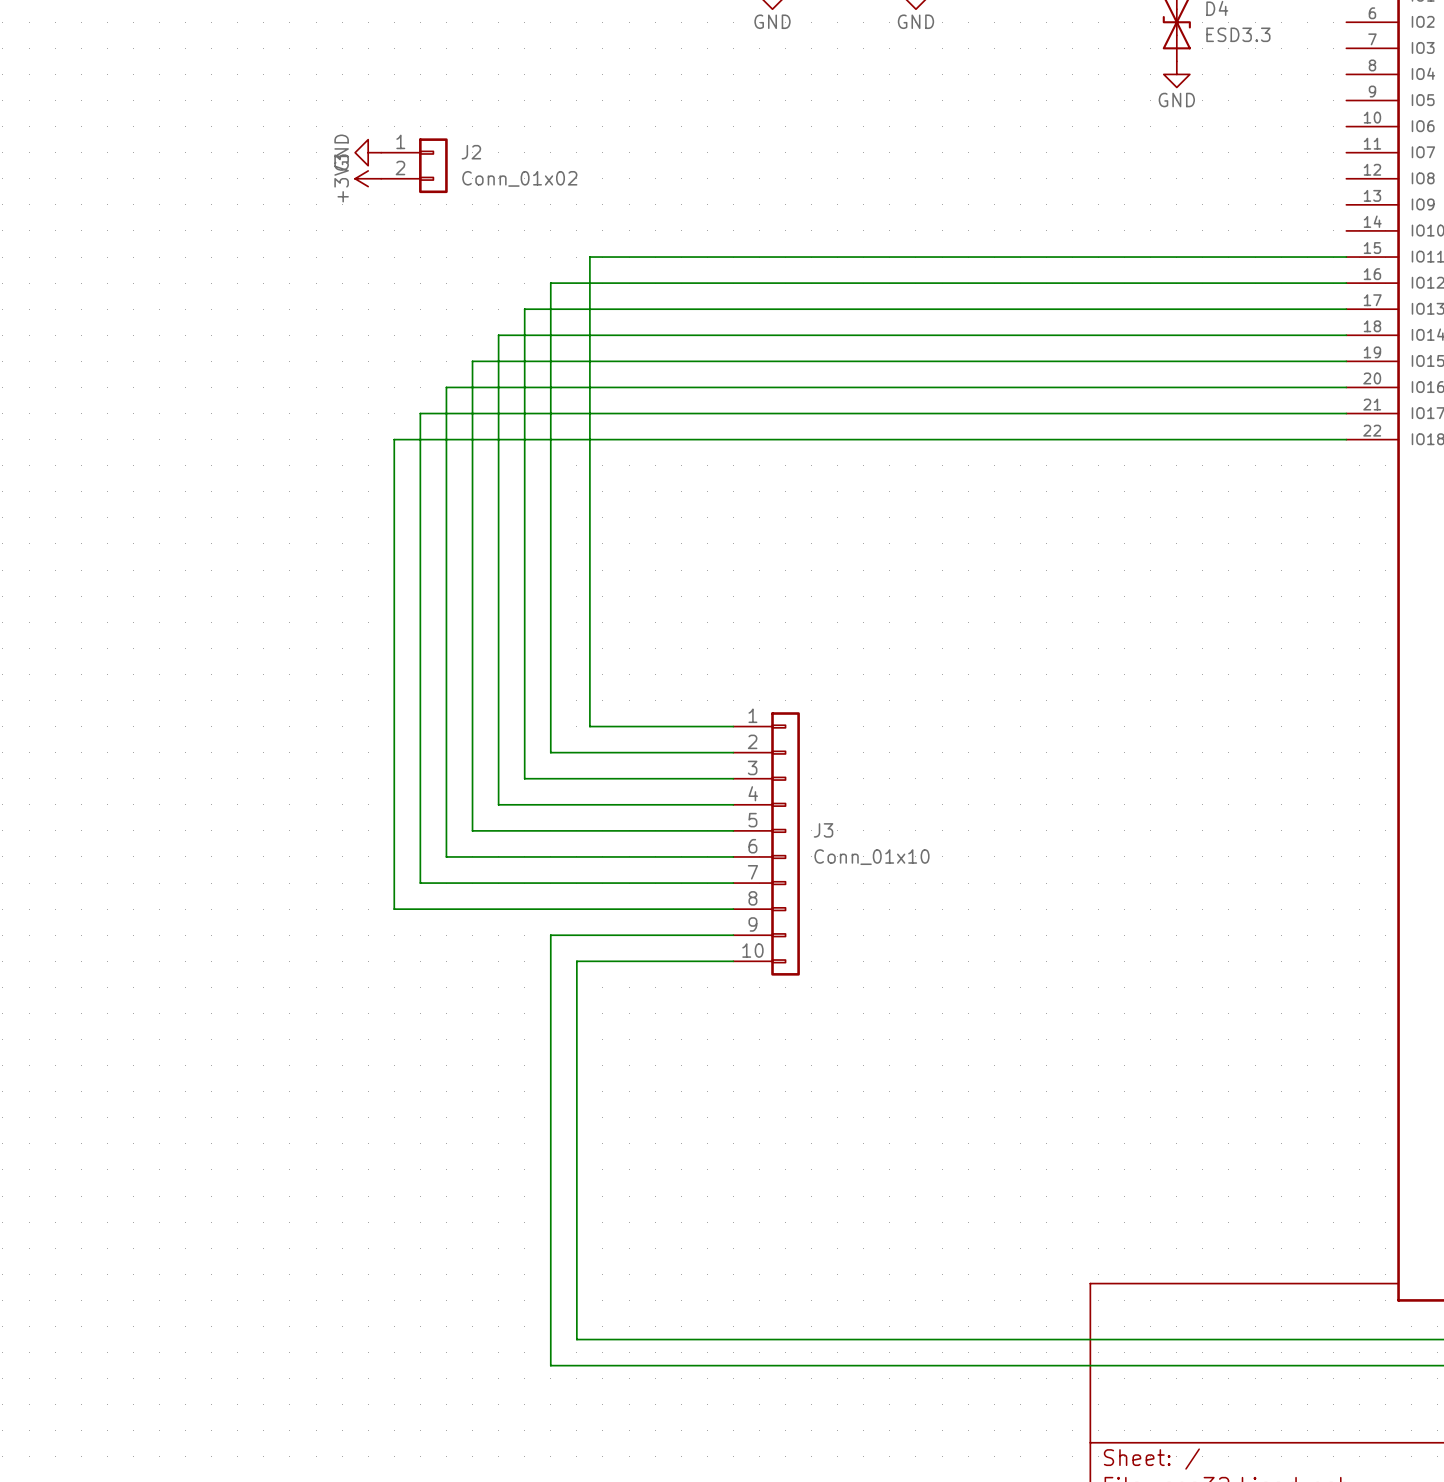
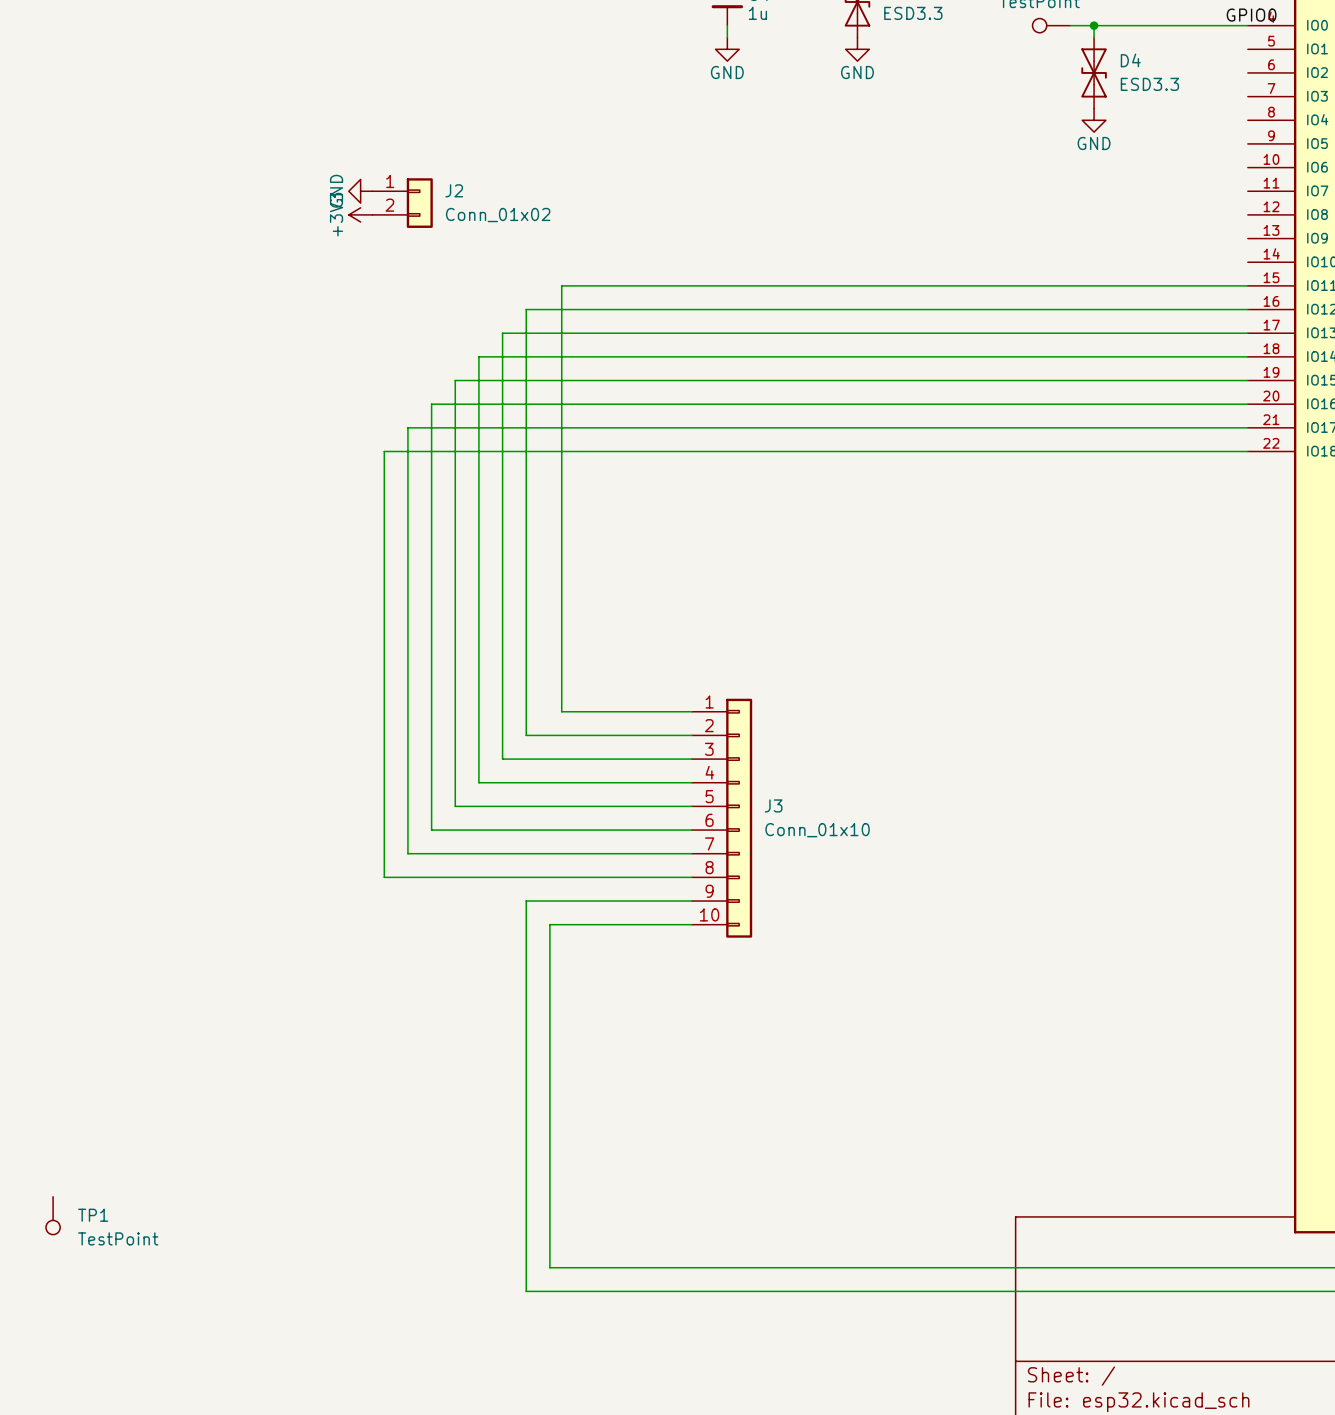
TP1: none -> TestPoint (53, 1215)

